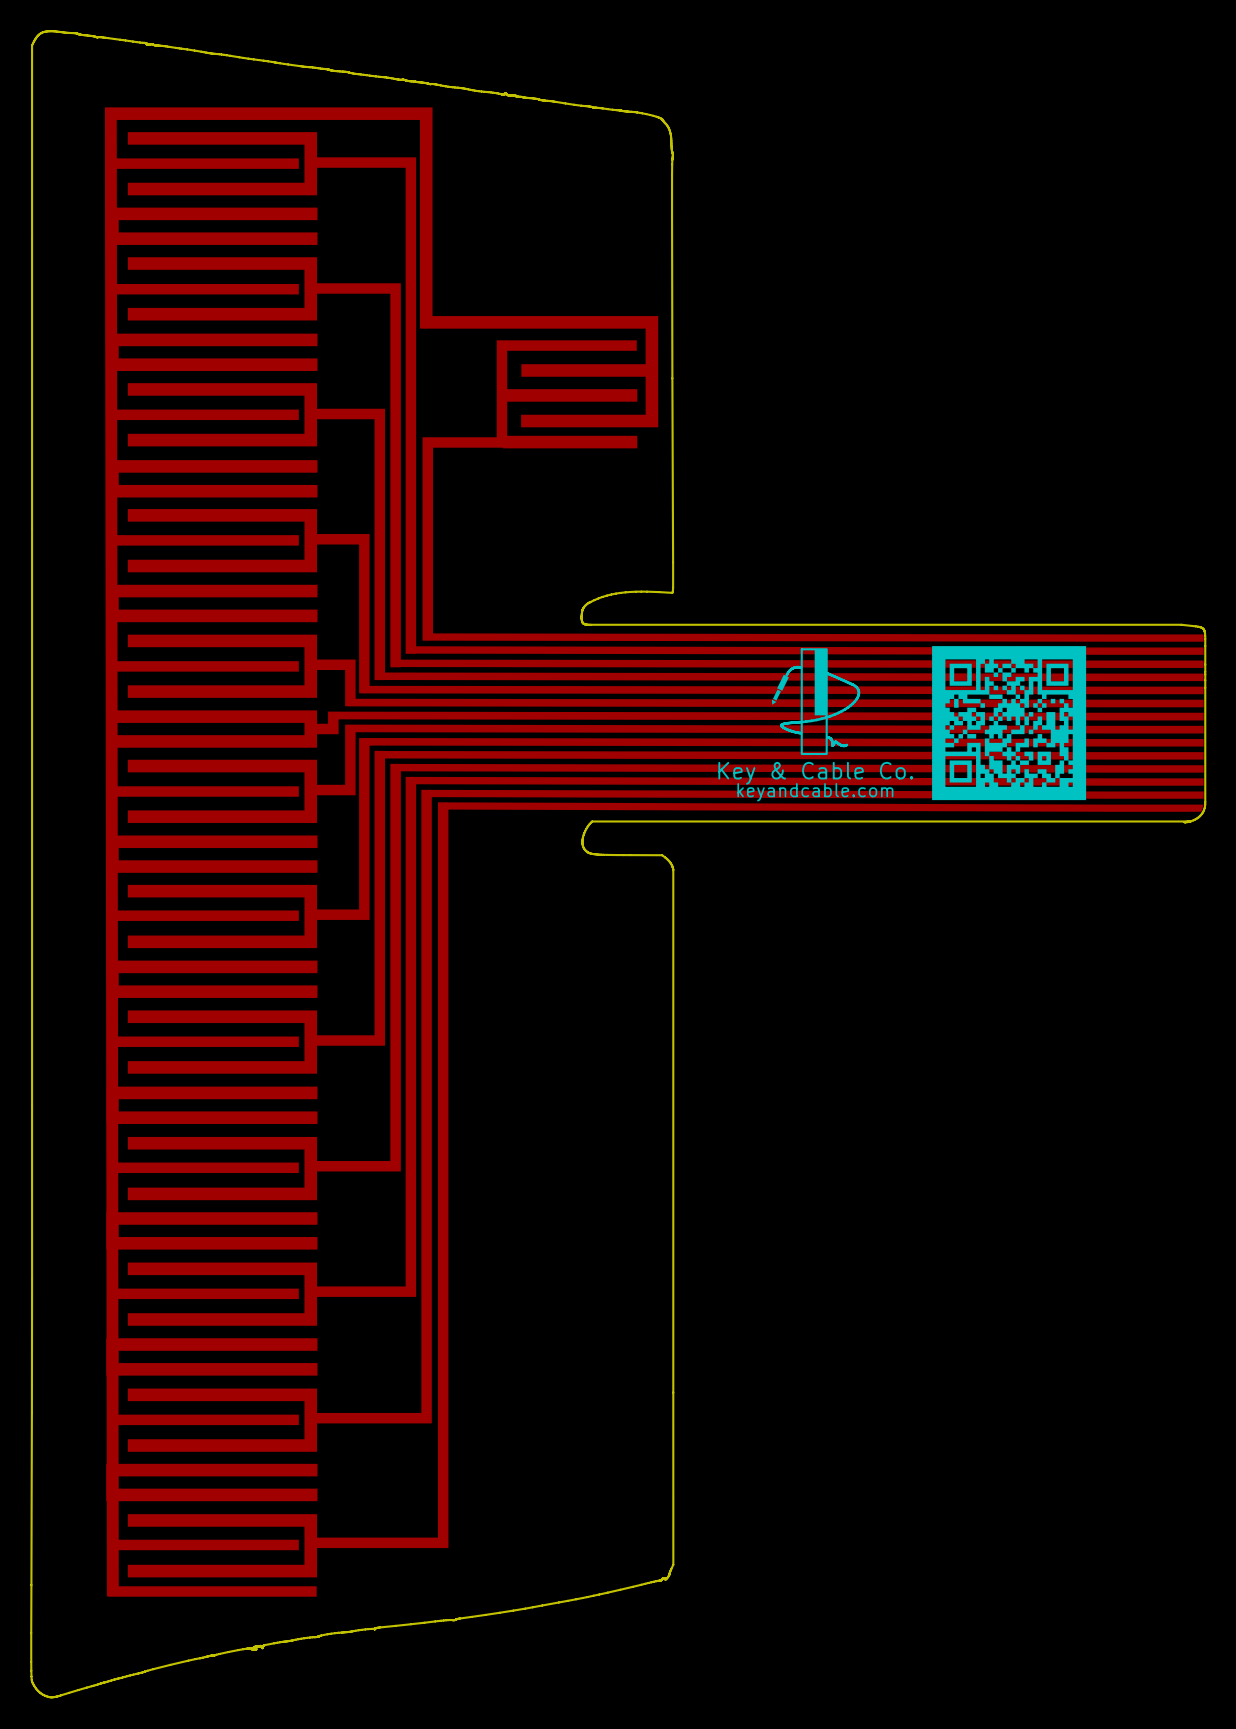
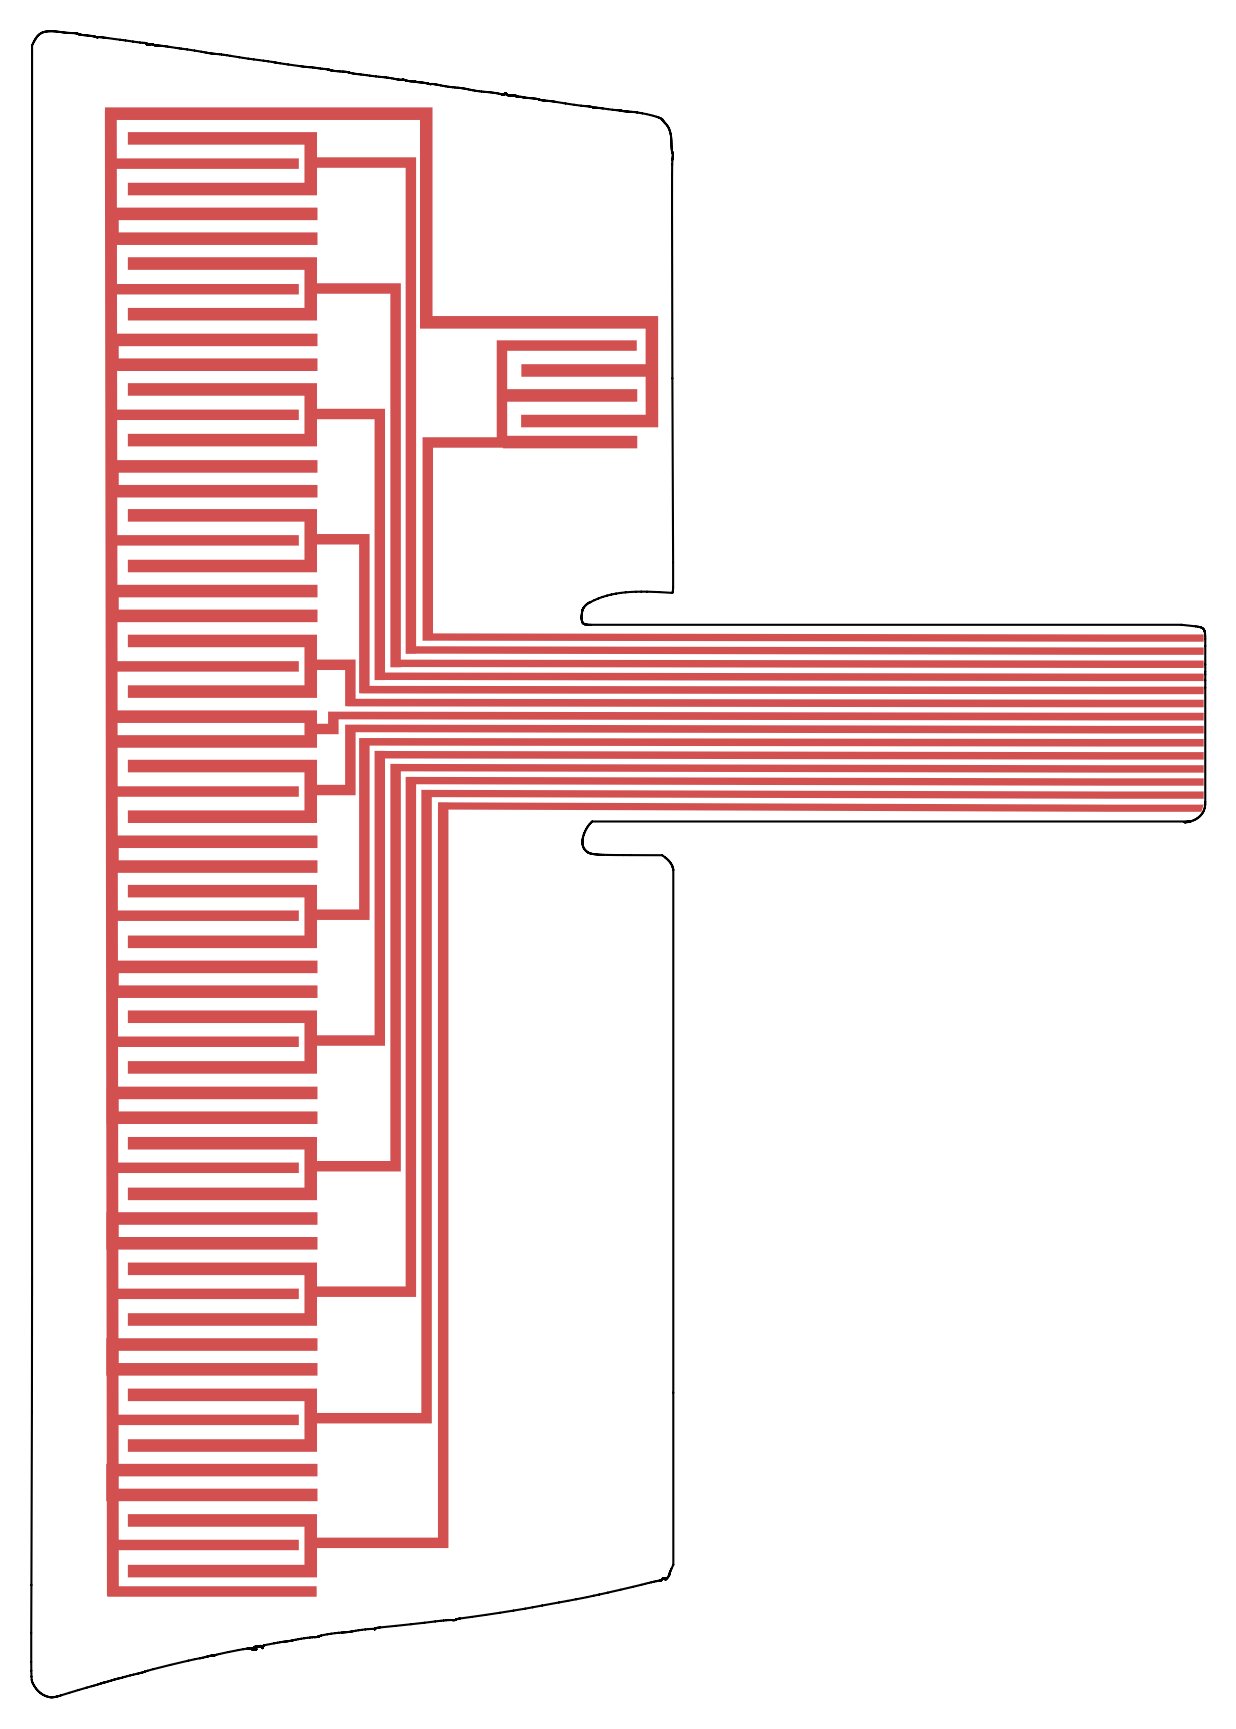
drawing: [771, 646, 1087, 801] -> none

